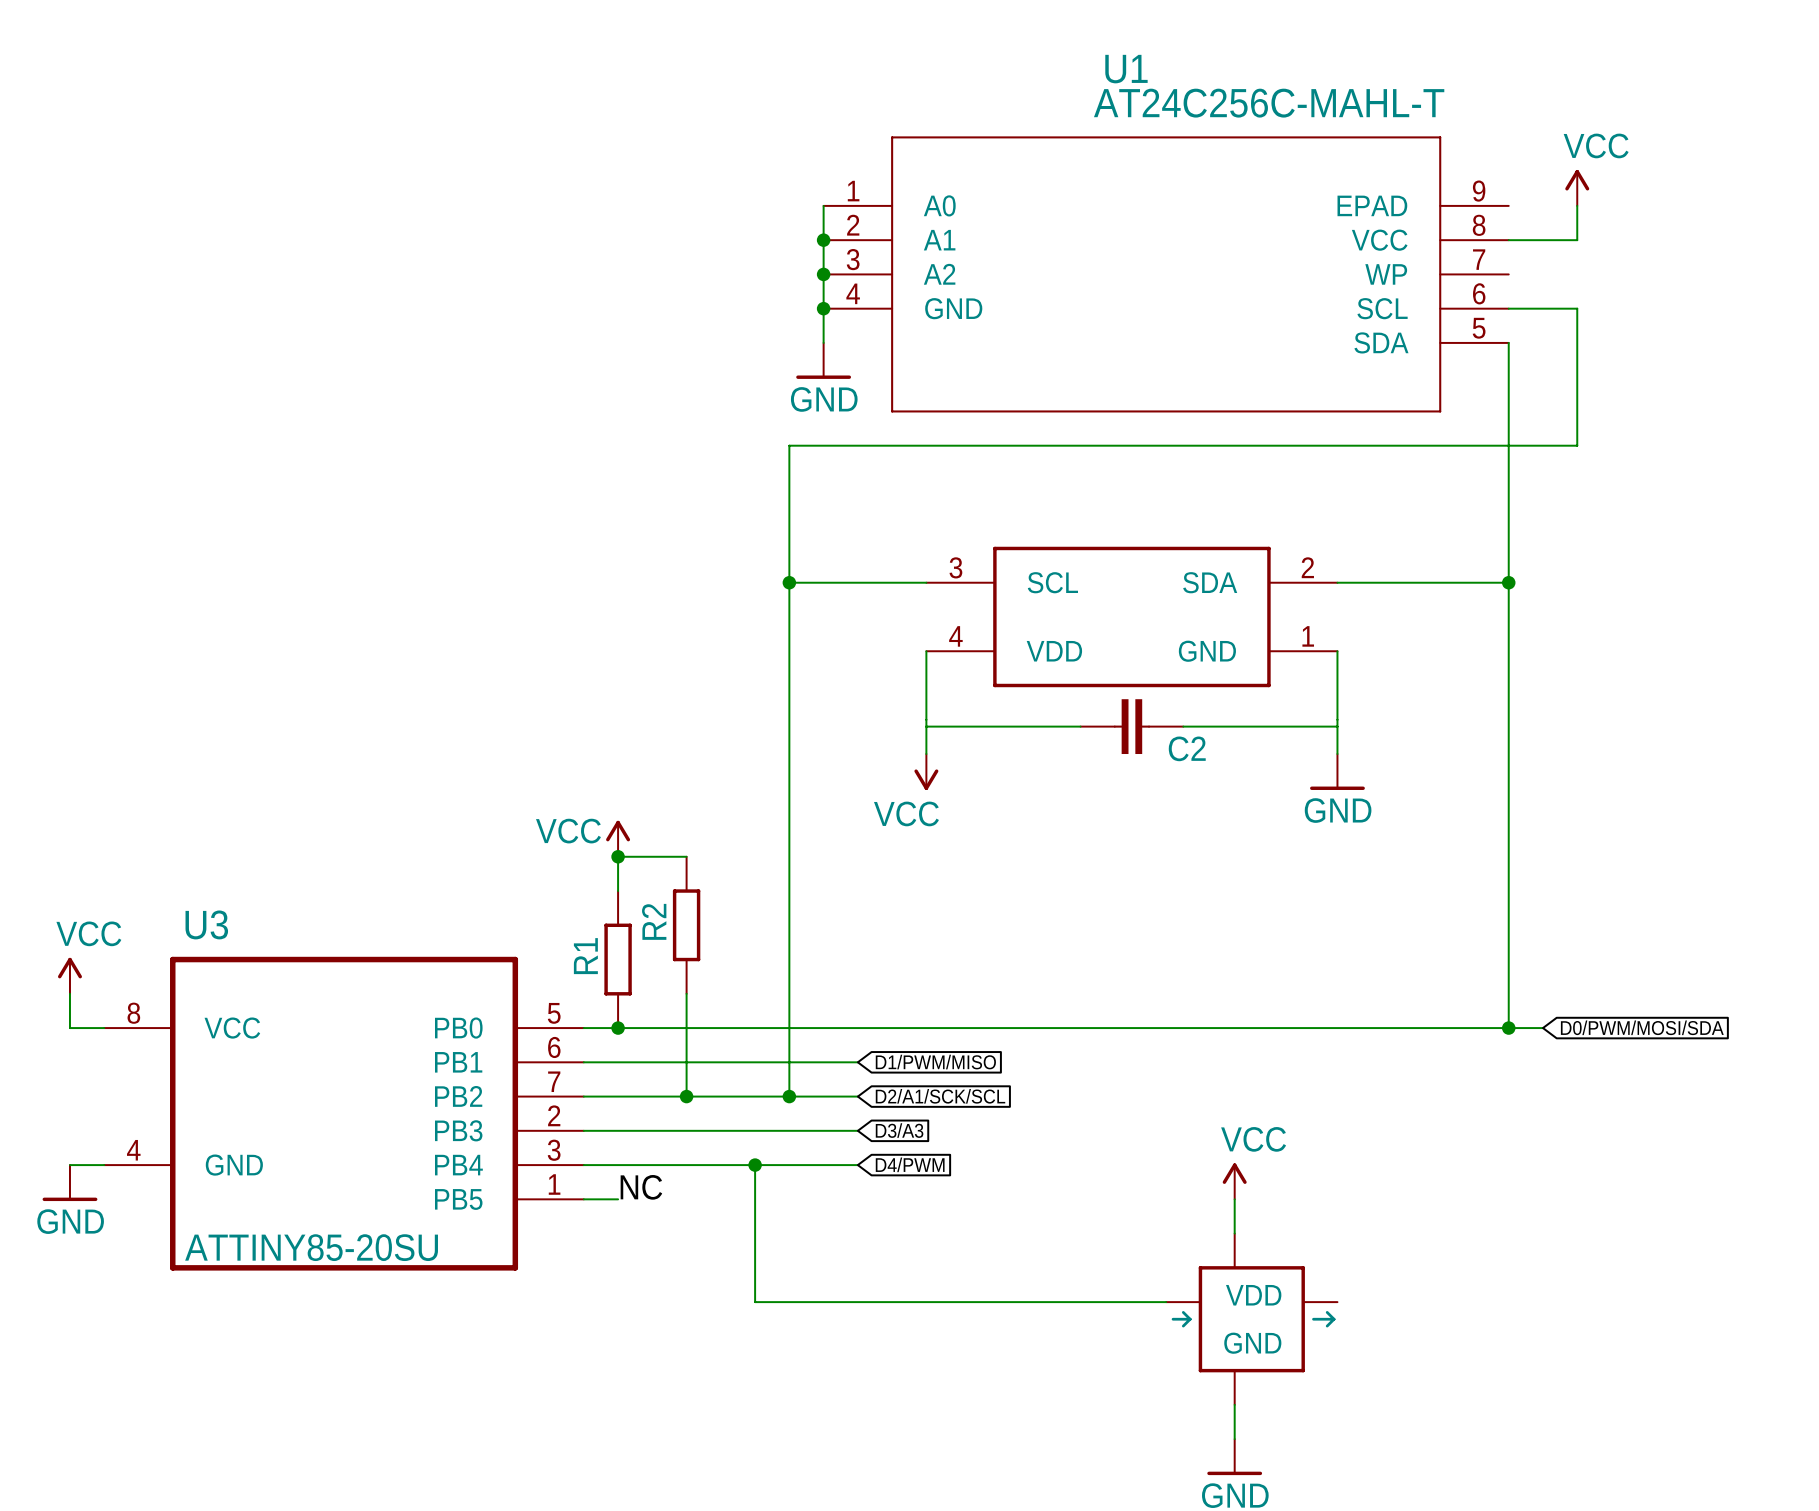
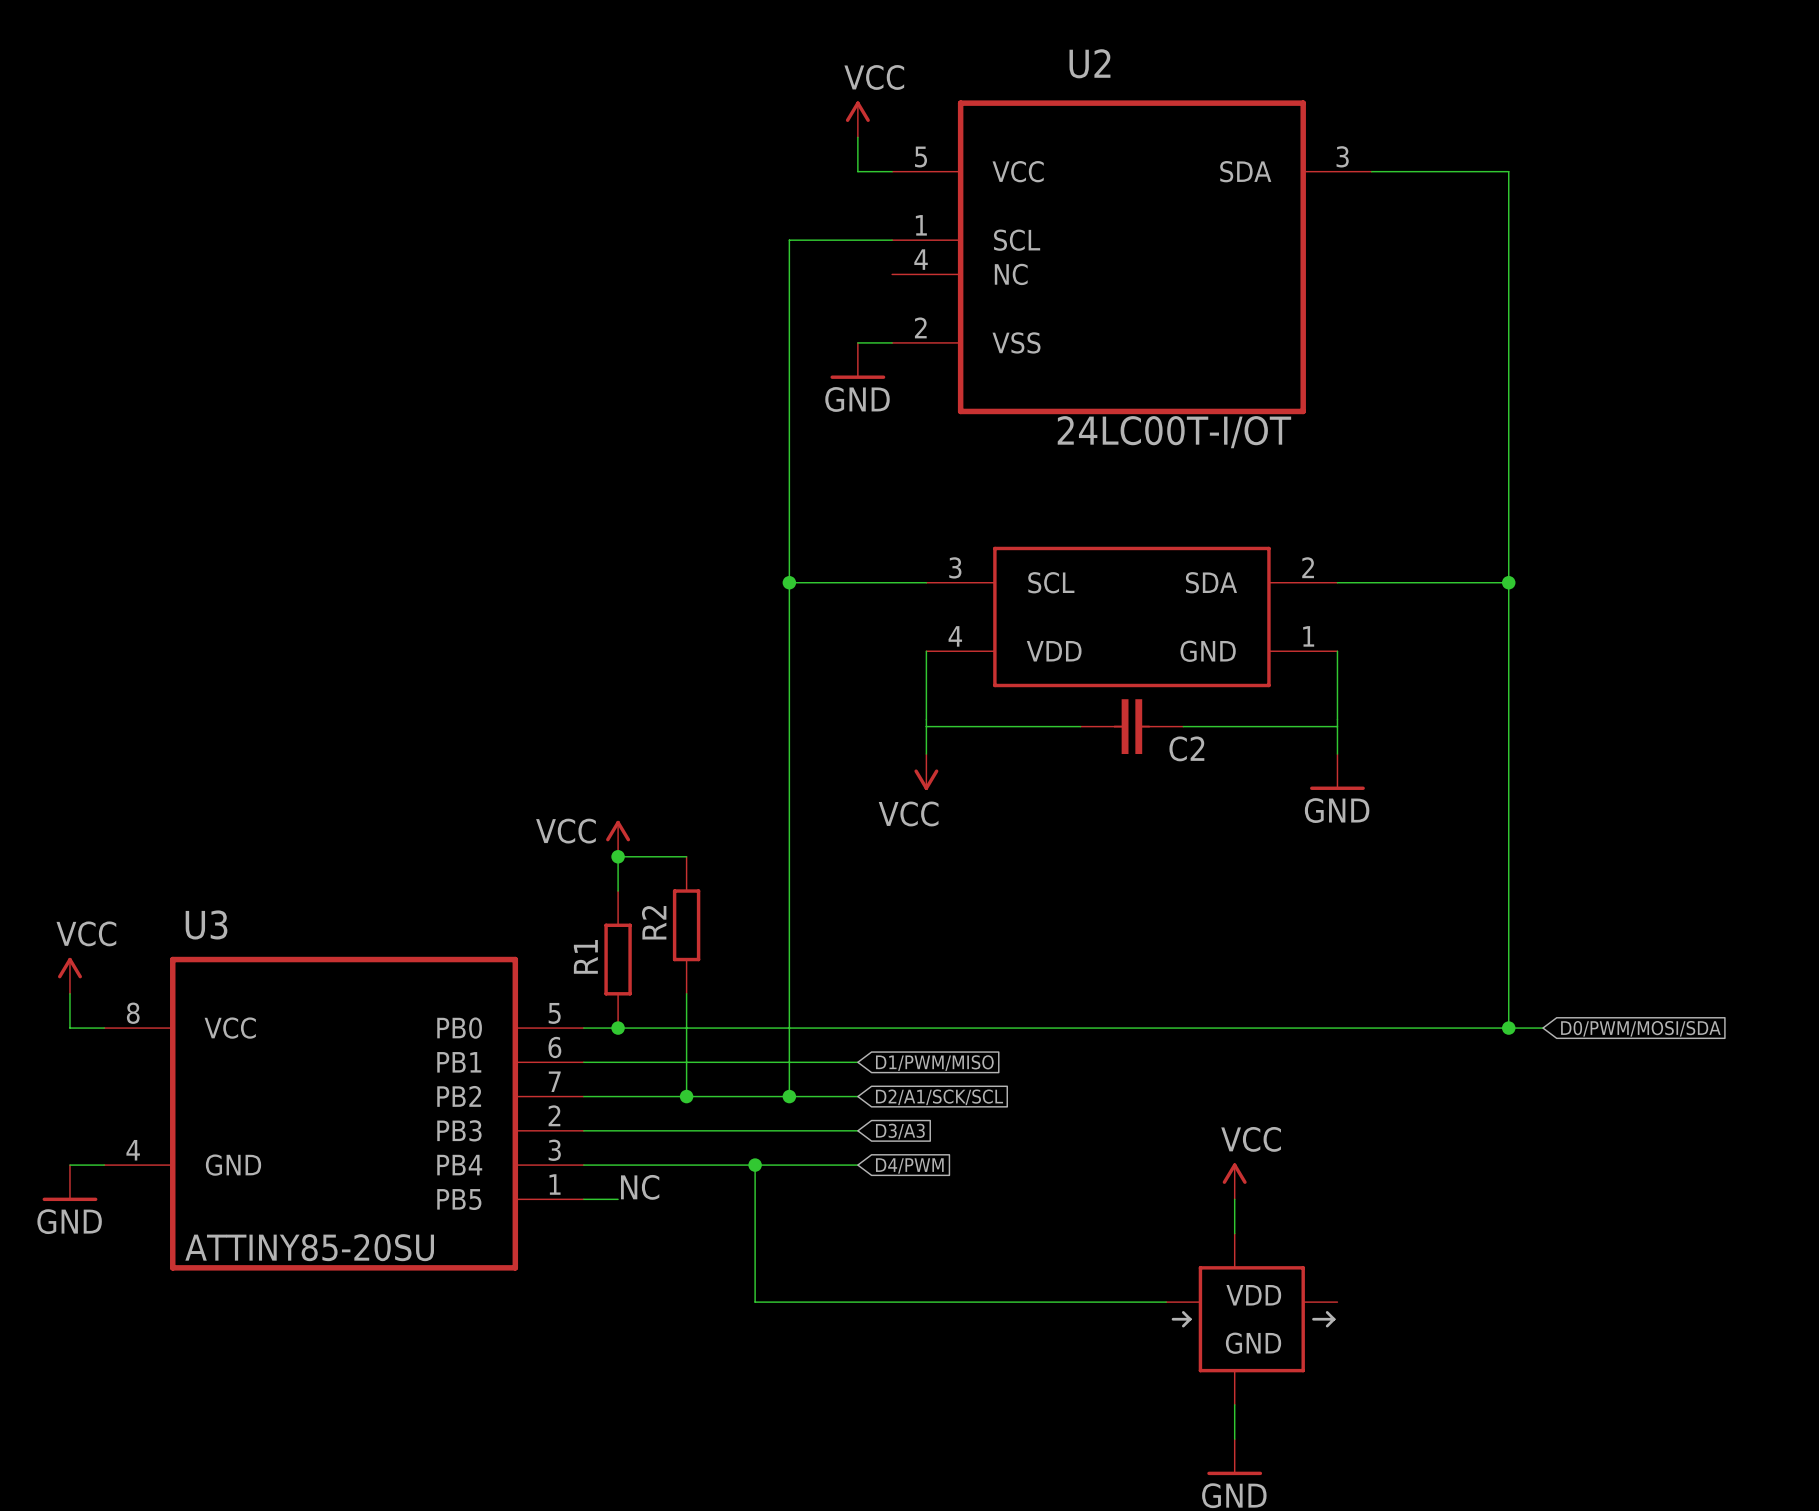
power symbol: none -> VCC (857, 119)
wire: none -> (857, 137) (857, 171) (892, 171)
wire: none -> (1371, 171) (1508, 171) (1508, 342)
power symbol: VCC (1577, 187) -> none
wire: (823, 205) (823, 342) -> none
wire: (1577, 205) (1577, 240) (1508, 240) -> none
junction: (823, 240) -> none
U2: none -> 24LC00T-I/OT (1131, 257)
junction: (823, 274) -> none
U1: AT24C256C-MAHL-T (1166, 274) -> none
junction: (823, 308) -> none
wire: (1508, 308) (1577, 308) (1577, 445) (789, 445) -> (892, 240) (789, 240) (789, 445)
wire: none -> (857, 342) (892, 342)
power symbol position: GND (823, 360) -> GND (857, 360)

